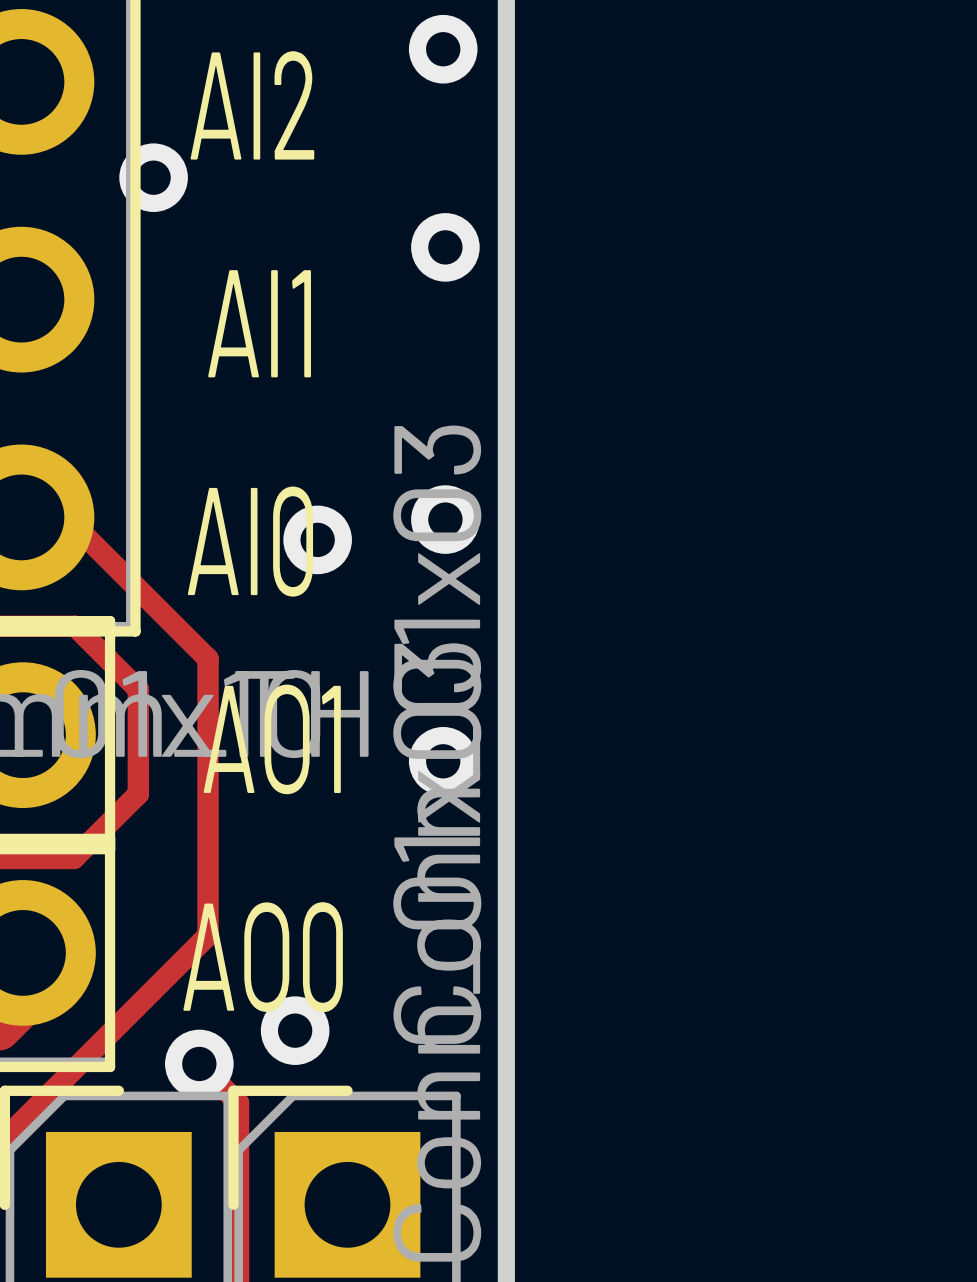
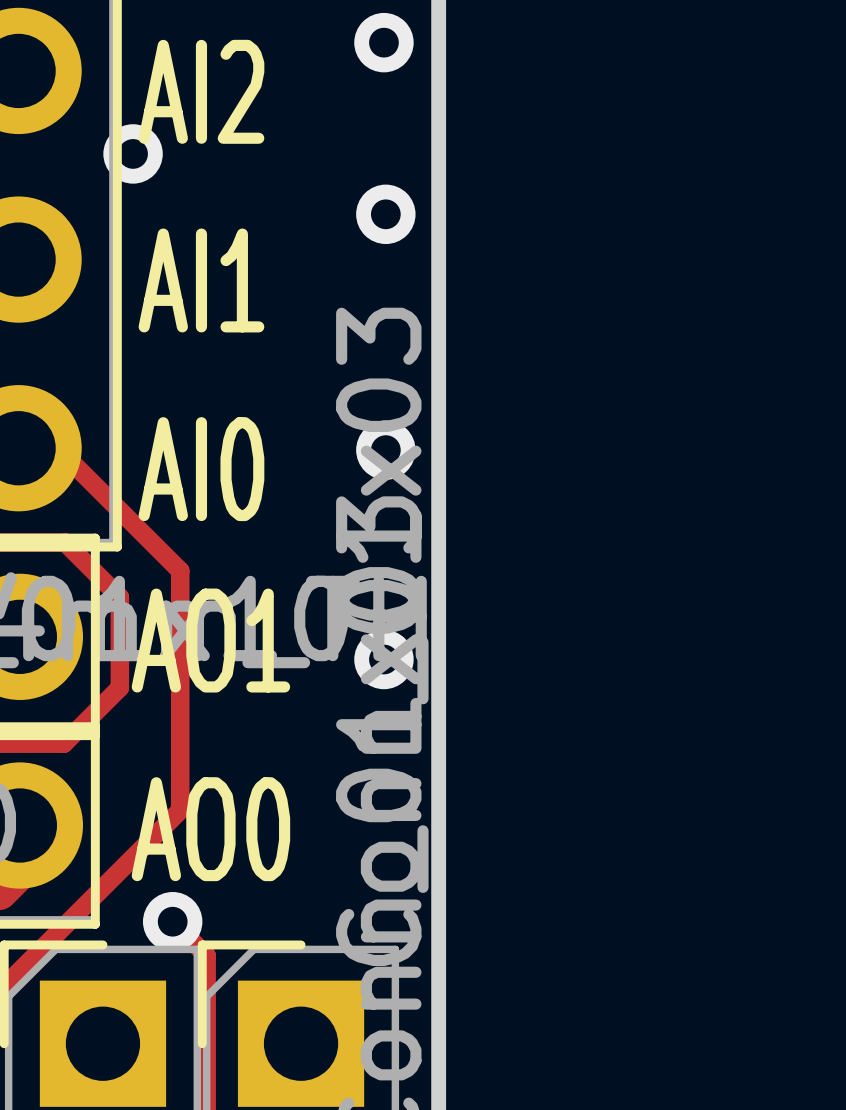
via: (317, 539) -> none
via: (295, 1030) -> none

